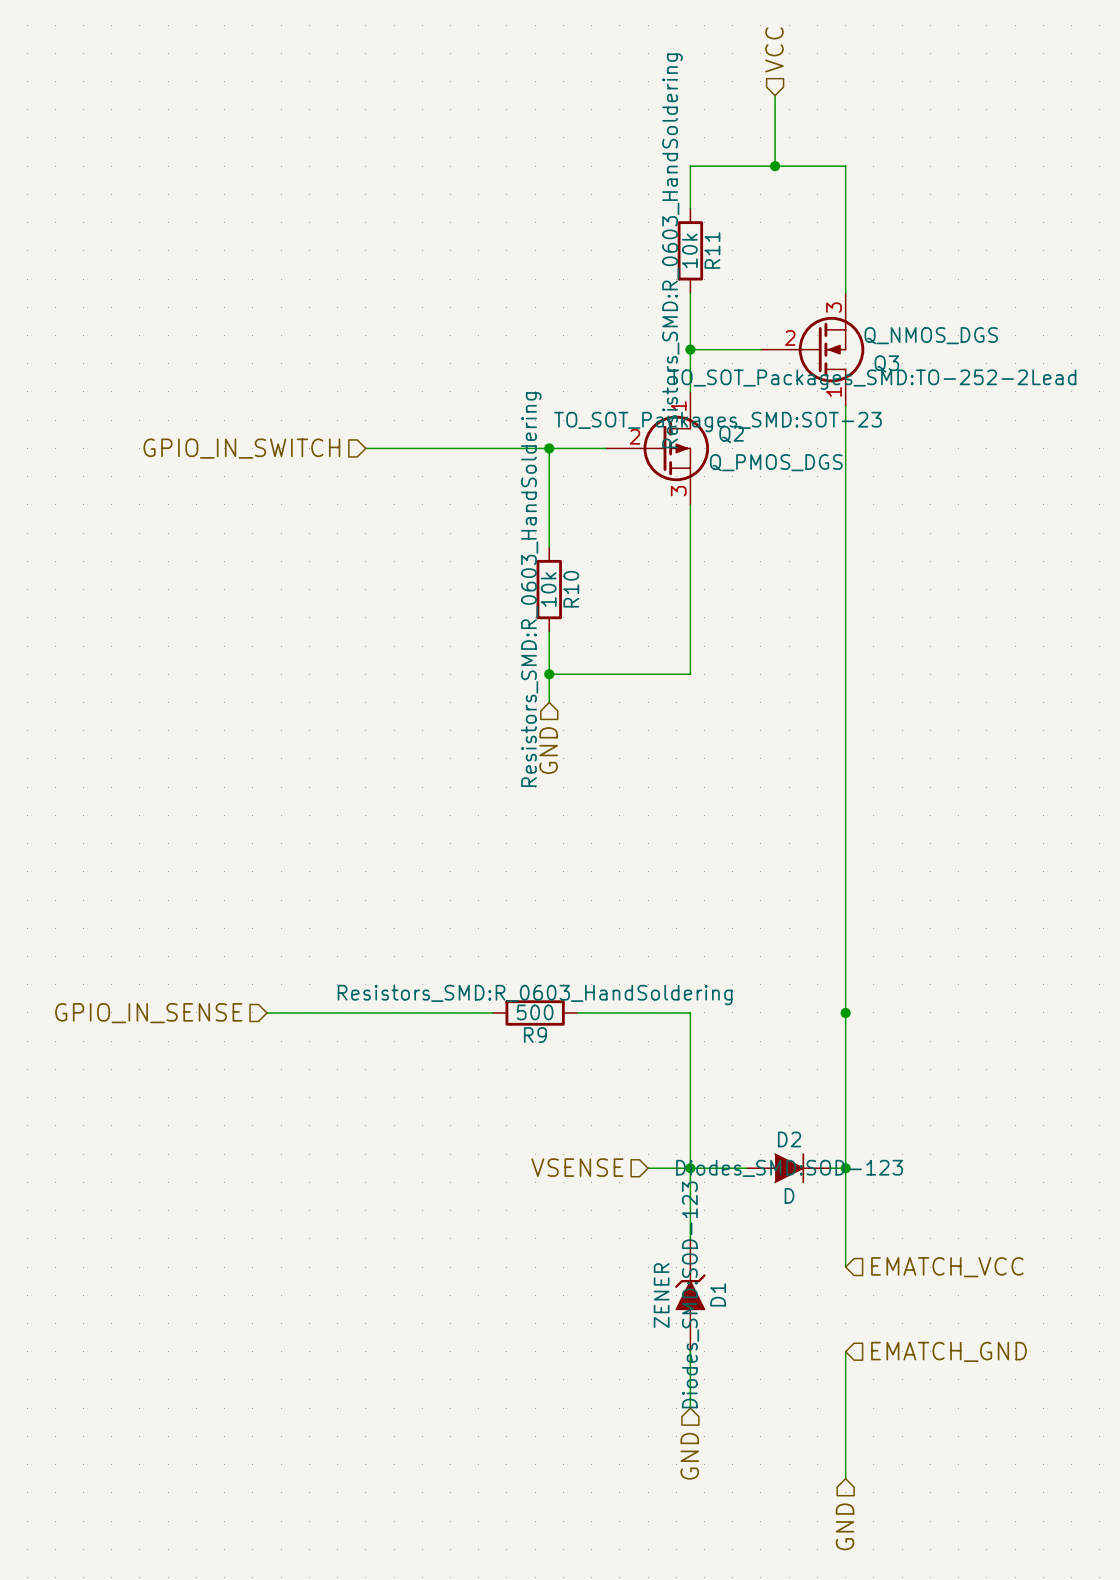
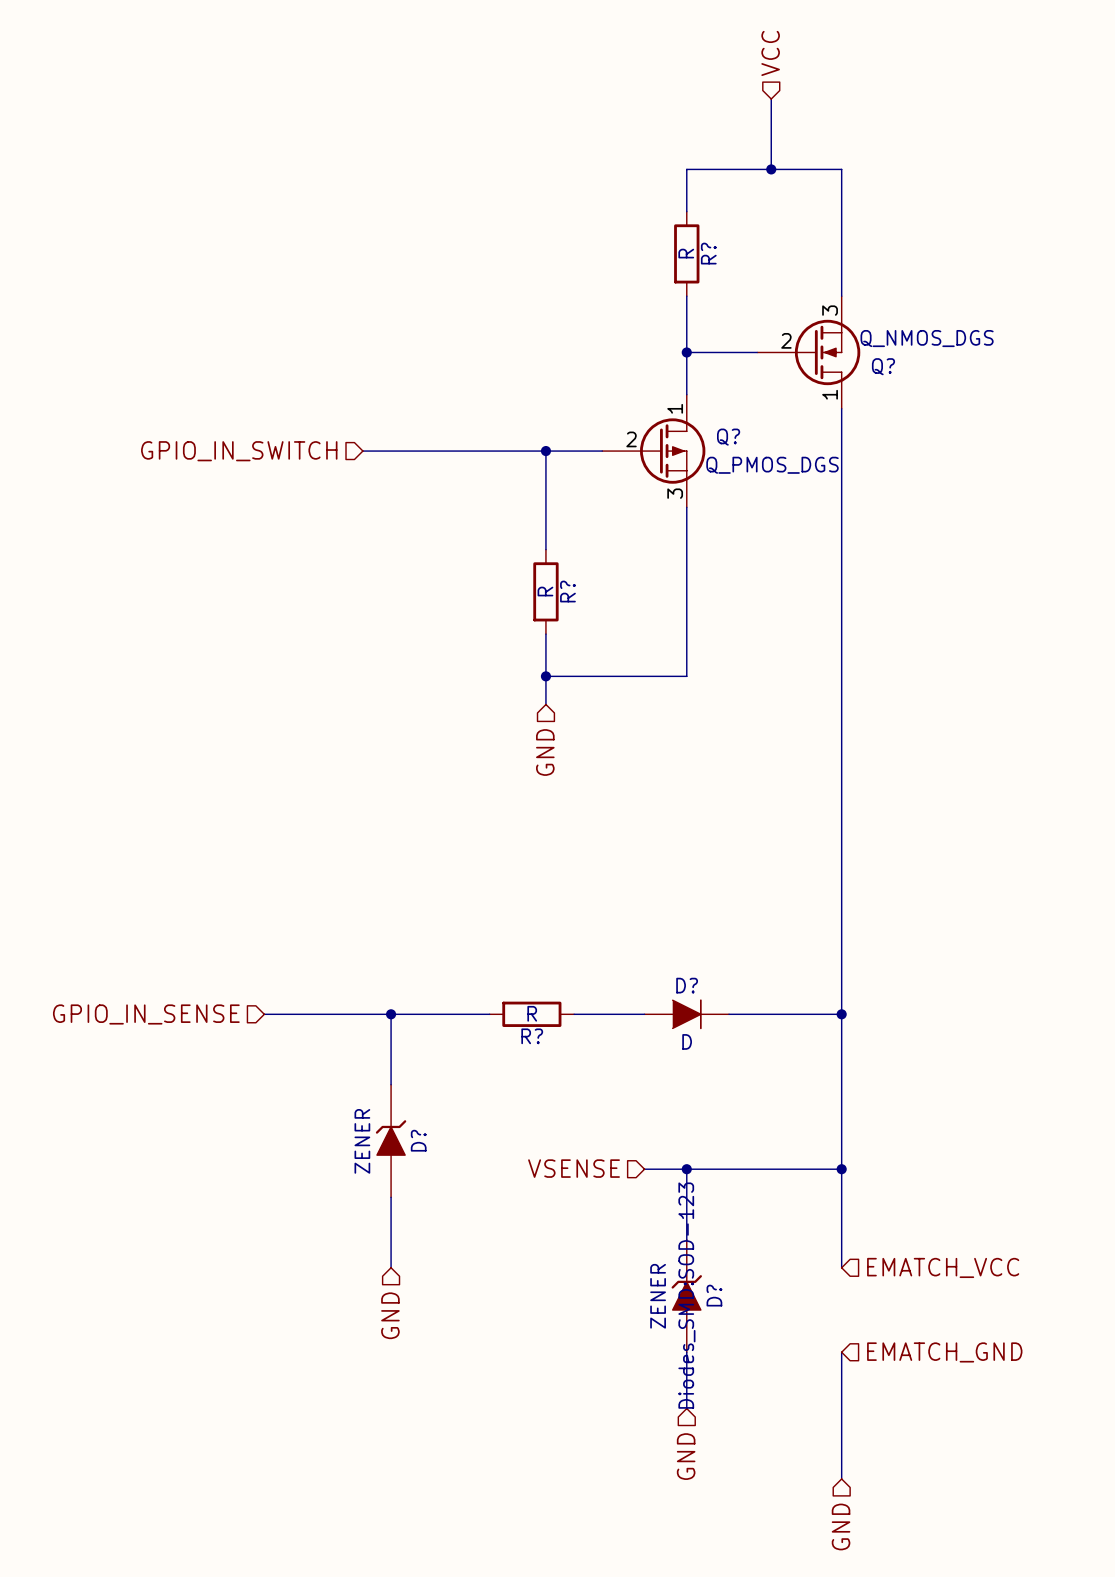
R11 text: Resistors_SMD:R_0603_HandSoldering (672, 250) -> none
R11 value: 10k (689, 250) -> R (686, 253)
R11 name: R11 (712, 250) -> R? (708, 253)
Q3 name: Q3 (886, 363) -> Q? (883, 366)
Q3 text: TO_SOT_Packages_SMD:TO-252-2Lead (872, 379) -> none
Q2 text: TO_SOT_Packages_SMD:SOT-23 (717, 422) -> none
Q2 name: Q2 (731, 434) -> Q? (728, 437)
R10 text: Resistors_SMD:R_0603_HandSoldering (531, 589) -> none
R10 value: 10k (548, 589) -> R (545, 591)
R10 name: R10 (571, 589) -> R? (567, 591)
R9 text: Resistors_SMD:R_0603_HandSoldering (535, 995) -> none
wire: none -> (391, 1014) (391, 1084)
junction: none -> (391, 1014)
R9 value: 500 (535, 1012) -> R (532, 1013)
wire: (648, 1012) (690, 1012) (690, 1168) -> none
D?: none -> D (686, 1014)
wire: none -> (729, 1014) (841, 1014)
R9 name: R9 (535, 1035) -> R? (532, 1036)
D?: none -> ZENER (391, 1141)
D2: D (789, 1168) -> none
wire: none -> (391, 1197) (391, 1267)
D1 name: D1 (718, 1294) -> D? (714, 1295)
hierarchical label: none -> GND (390, 1315)

